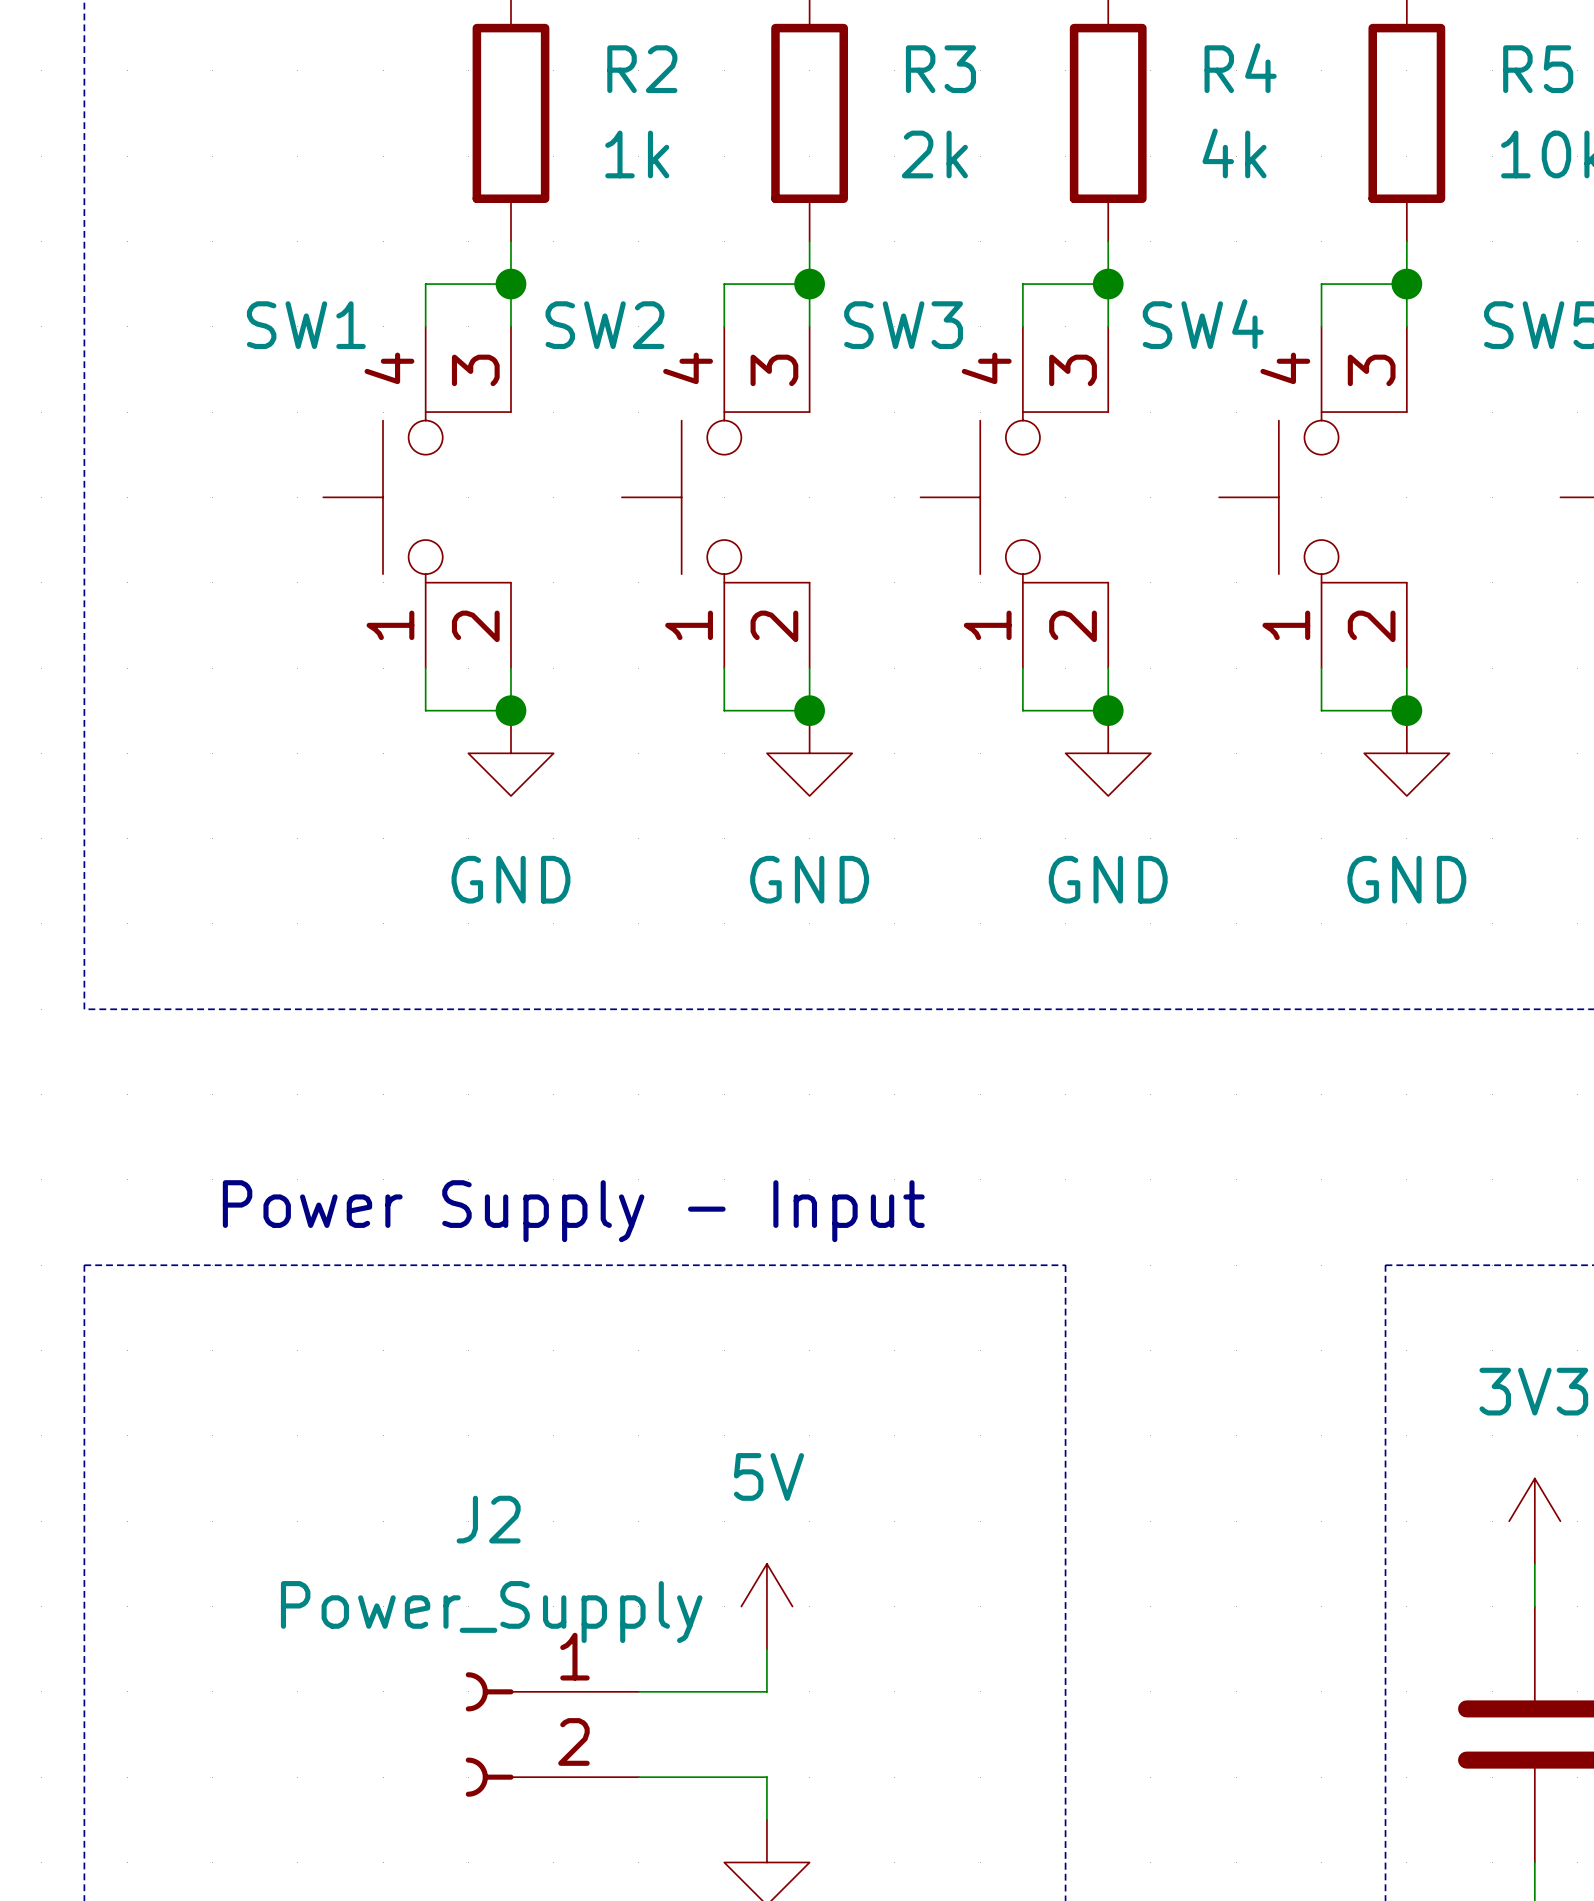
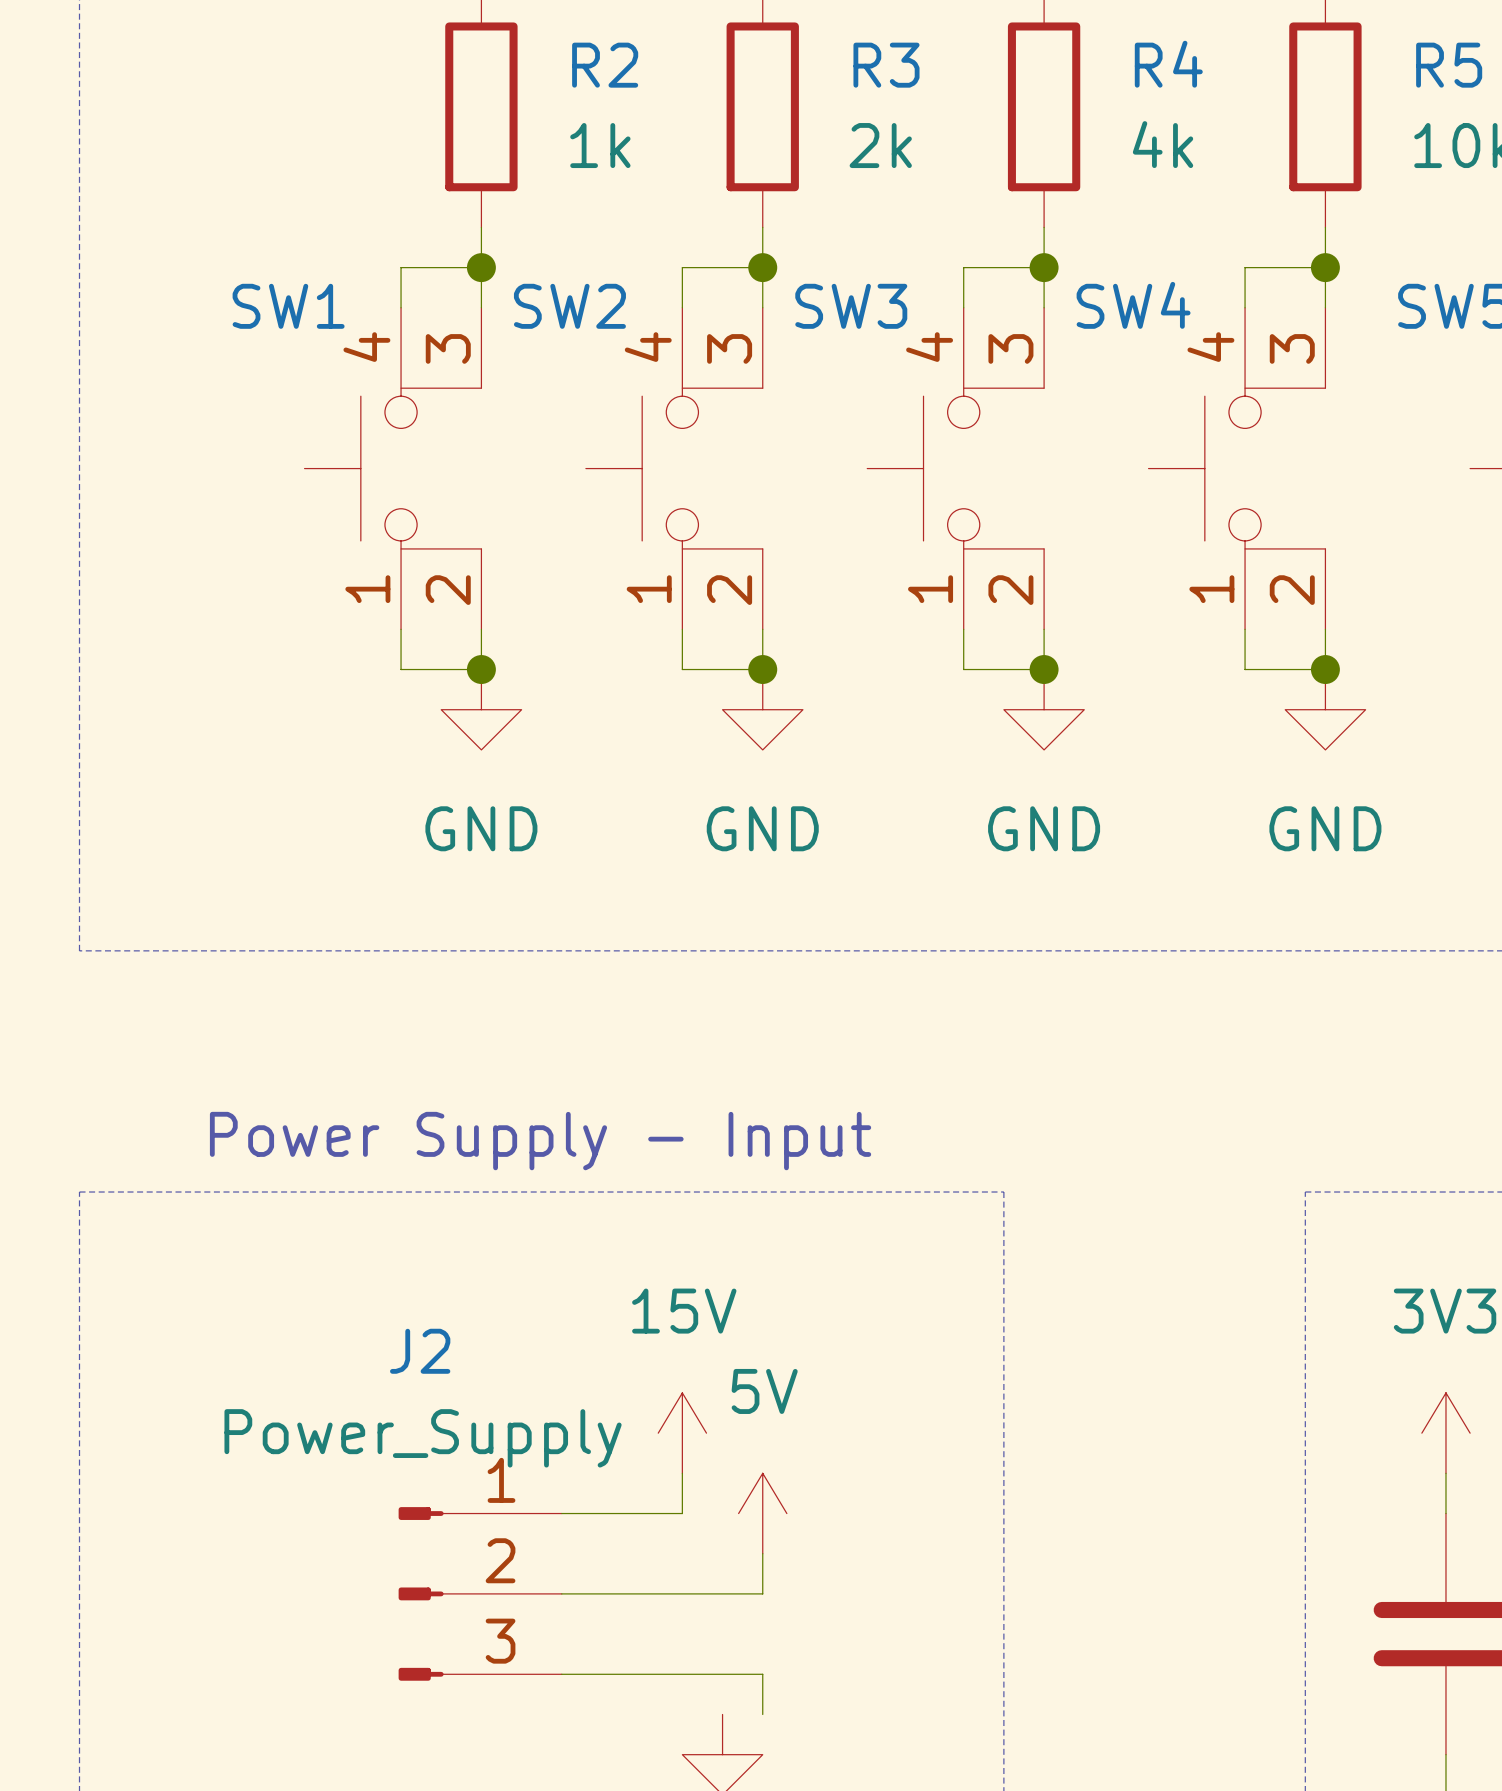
power symbol: none -> 15V (682, 1433)
wire: none -> (682, 1473) (682, 1513) (561, 1513)
power symbol position: 5V (766, 1606) -> 5V (762, 1513)
wire: (766, 1649) (766, 1691) -> (762, 1553) (762, 1593) (722, 1593)
J2 symbol: [465, 1672, 639, 1797] -> [398, 1507, 562, 1681]
wire: (766, 1777) (766, 1819) -> (722, 1674) (762, 1674) (762, 1714)

